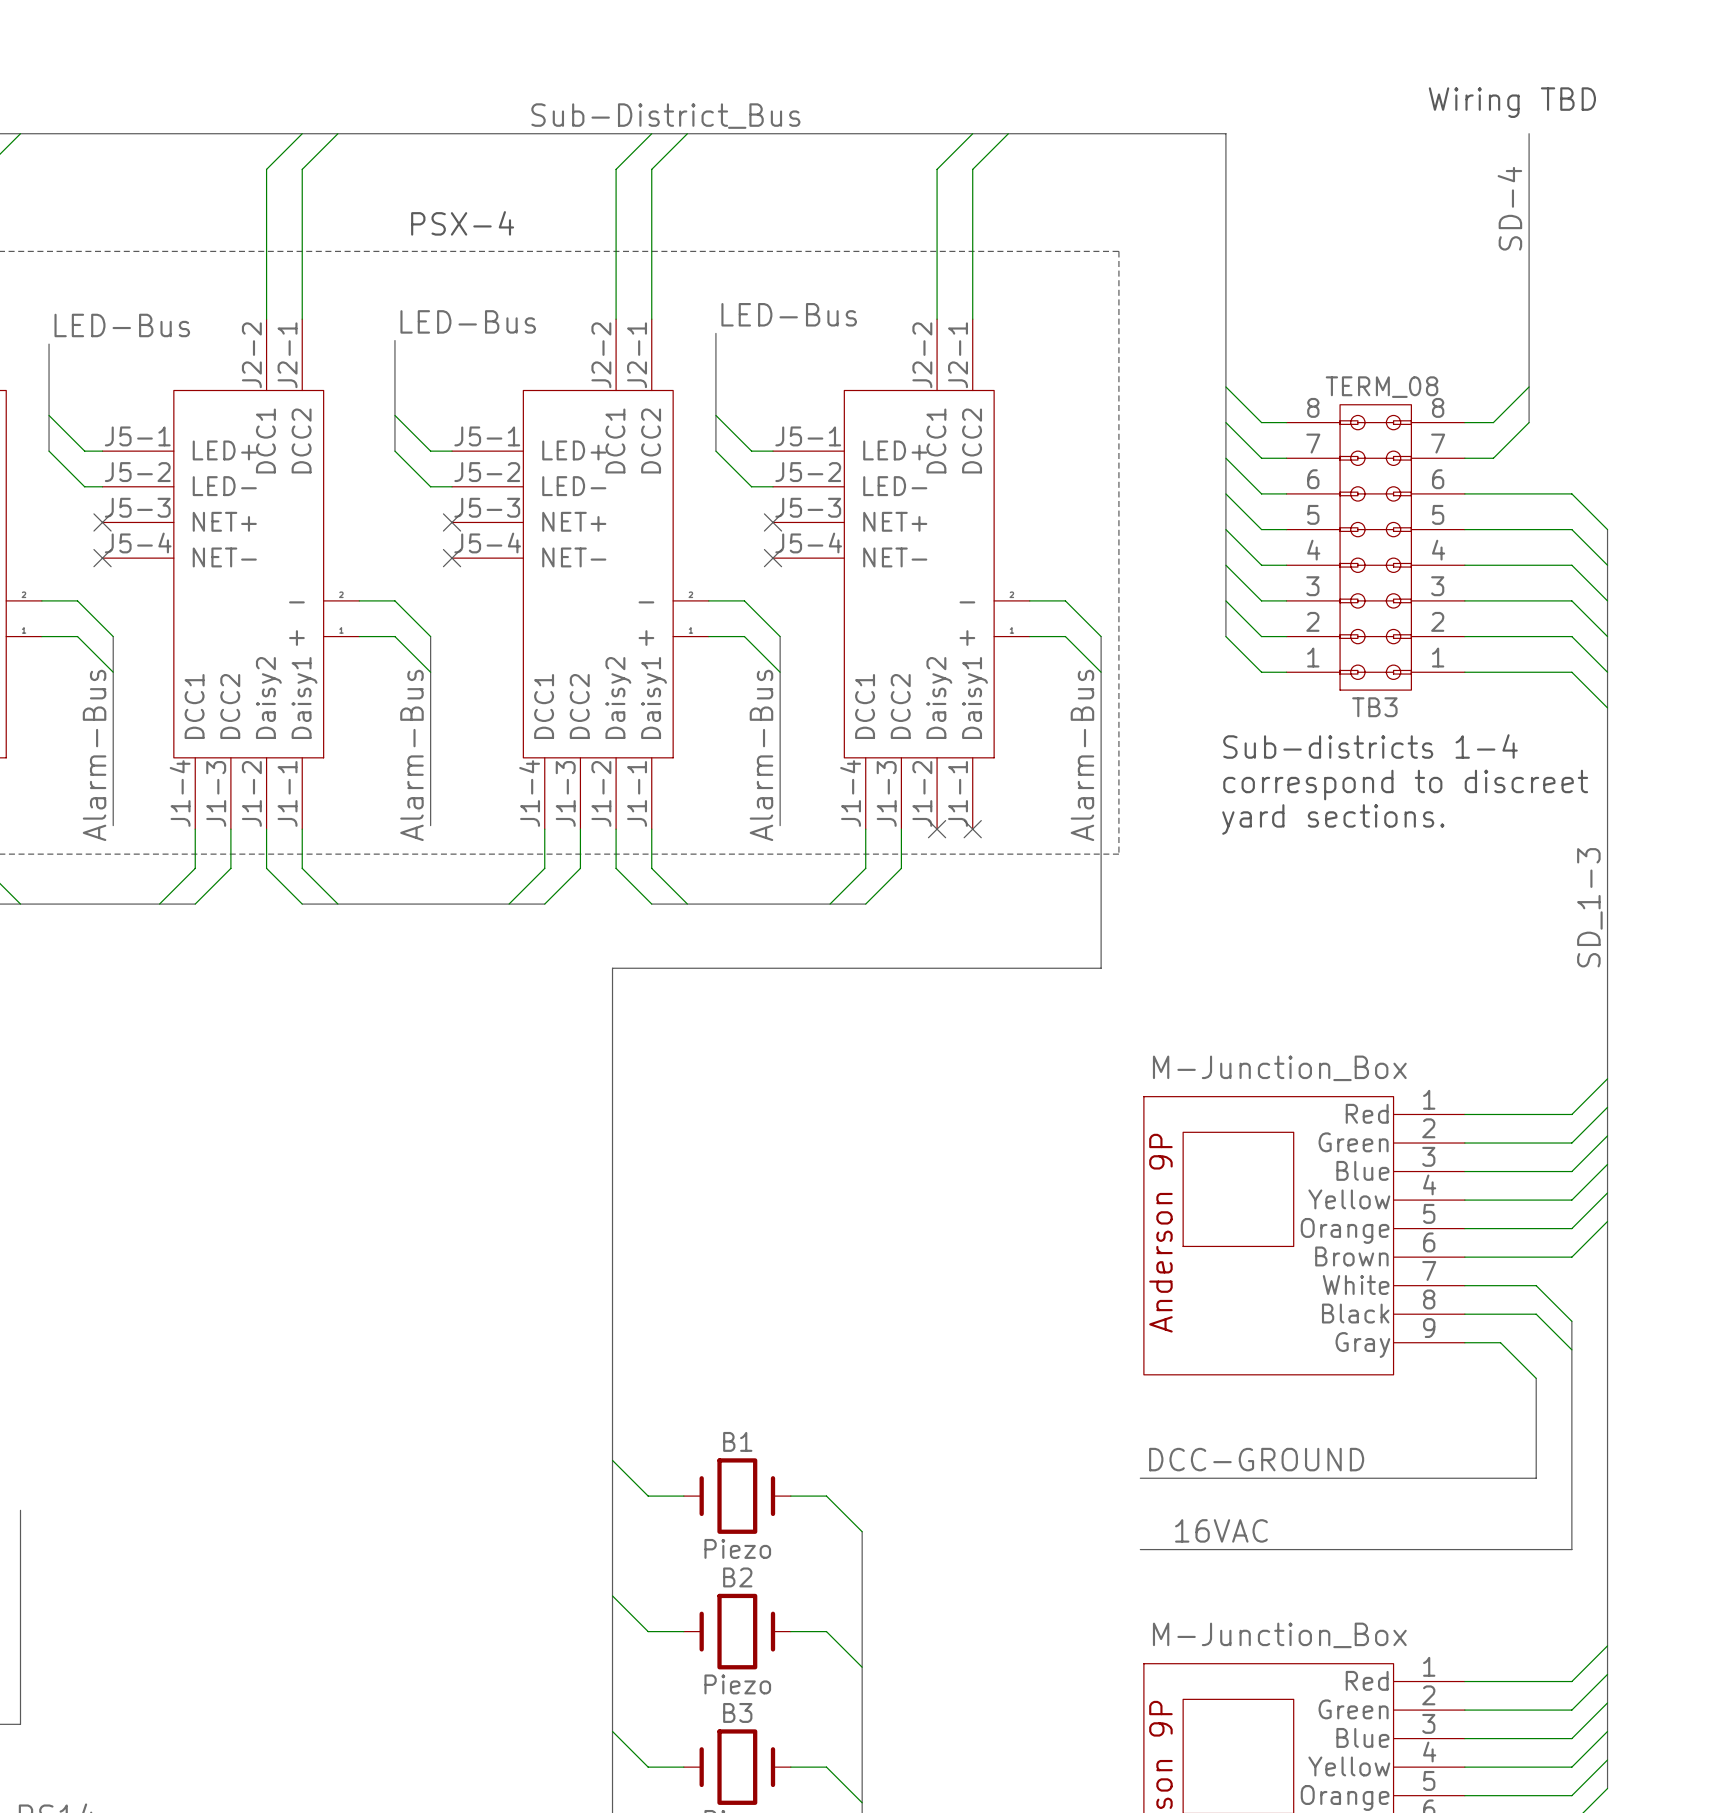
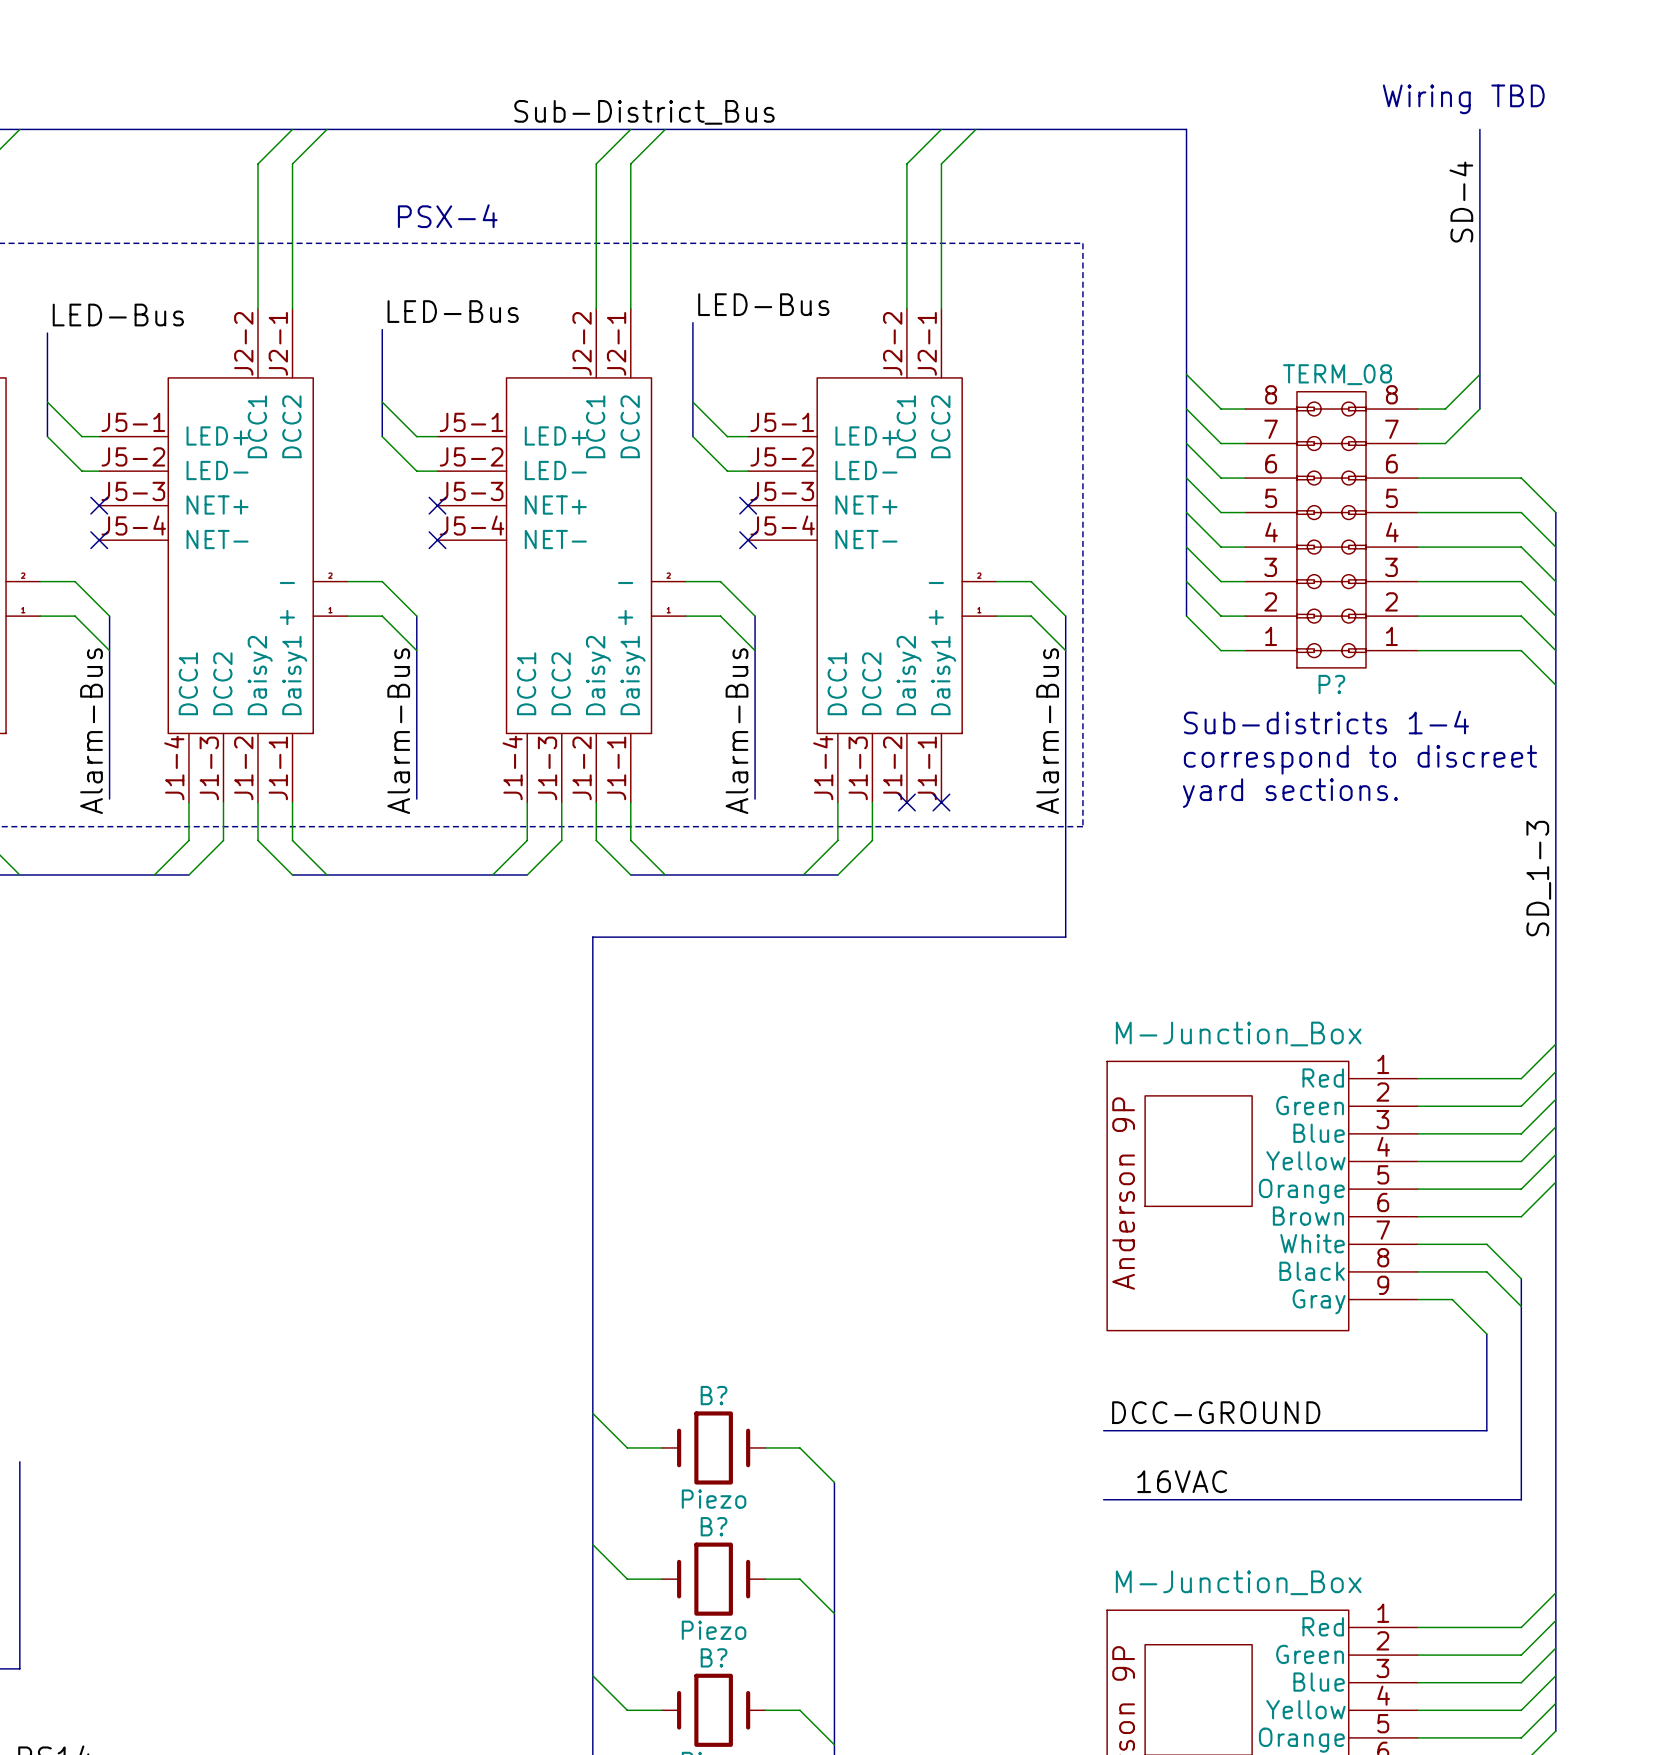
TB3 name: TB3 (1374, 707) -> P? (1331, 684)
B1 name: B1 (737, 1441) -> B? (714, 1395)
B2 name: B2 (737, 1577) -> B? (714, 1526)
B3 name: B3 (737, 1712) -> B? (714, 1657)

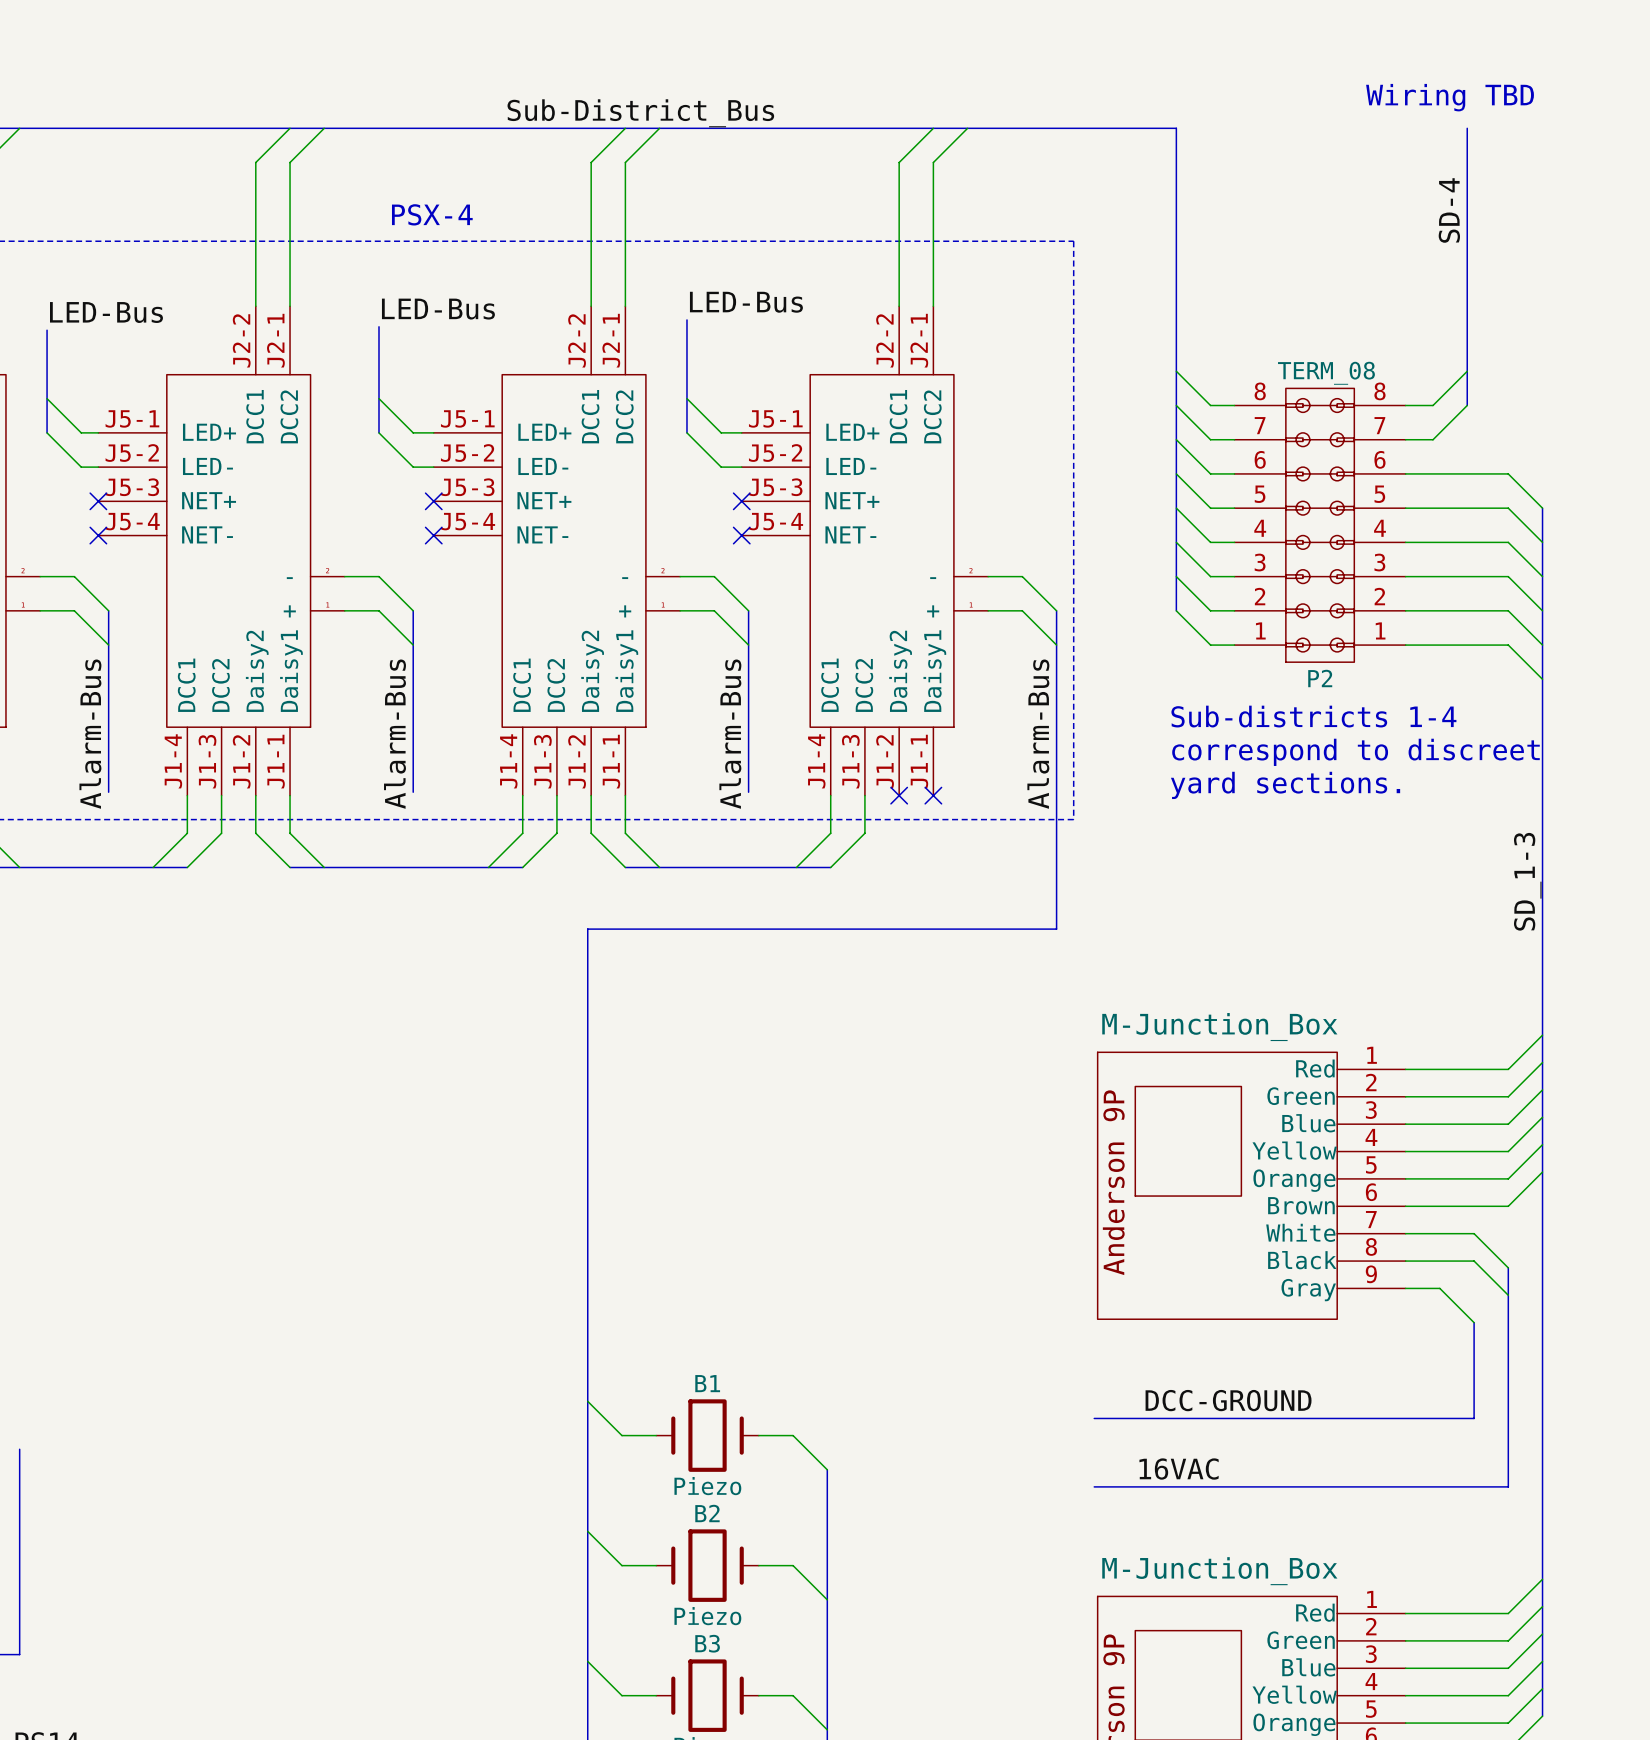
P? name: P? (1331, 684) -> P2 (1320, 678)
B? name: B? (714, 1395) -> B1 (707, 1383)
B? name: B? (714, 1526) -> B2 (707, 1513)
B? name: B? (714, 1657) -> B3 (707, 1643)

